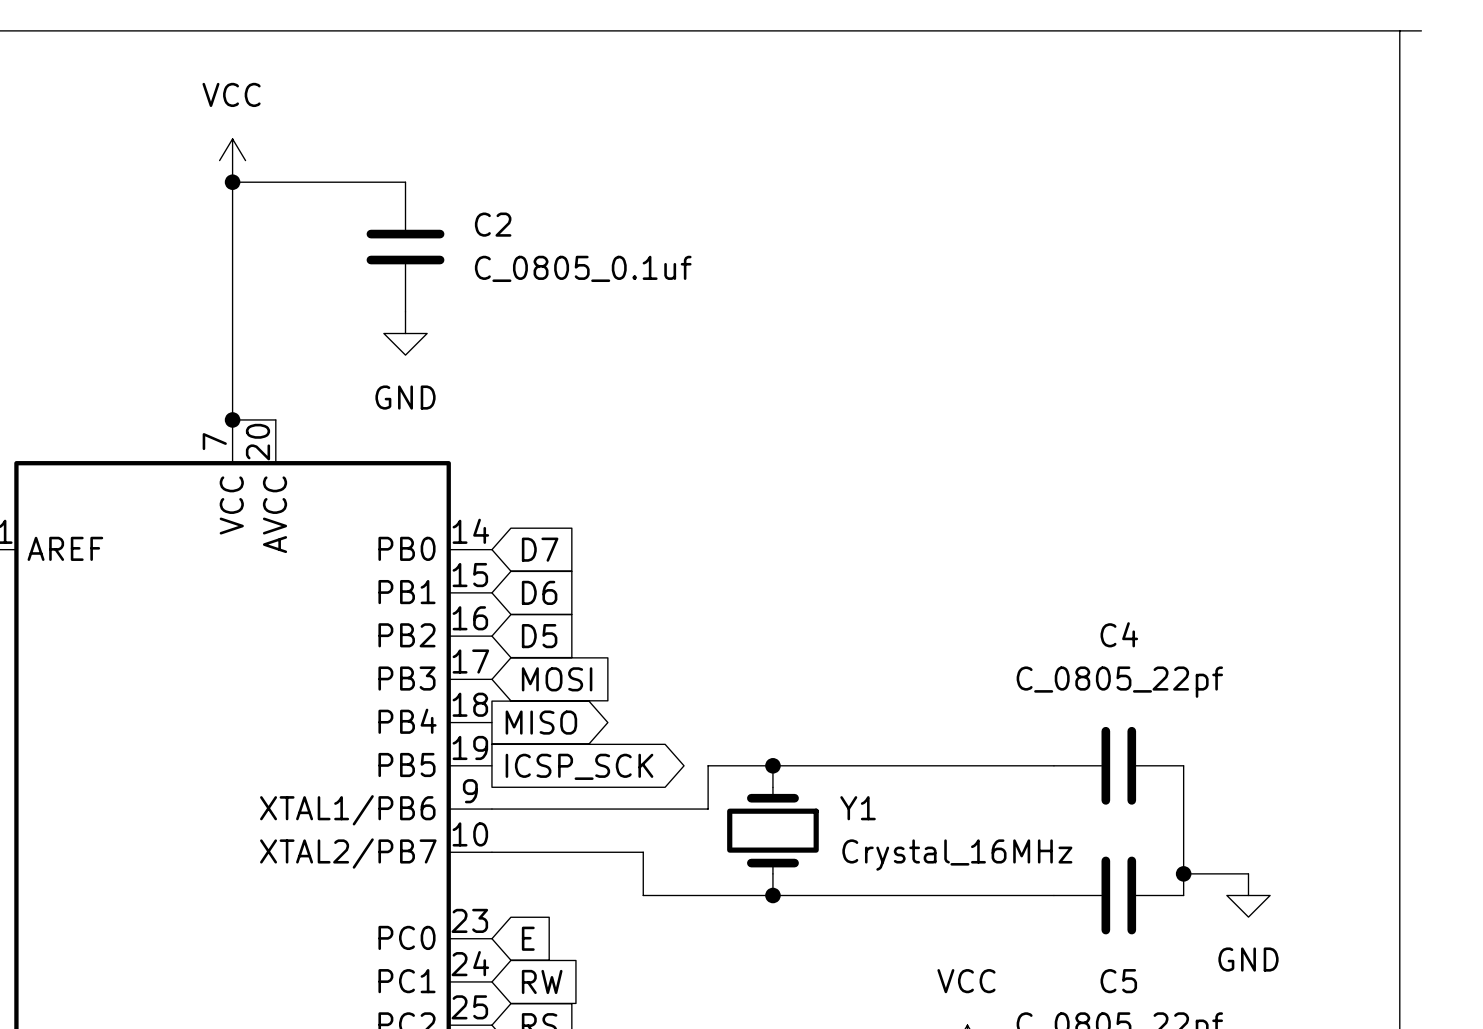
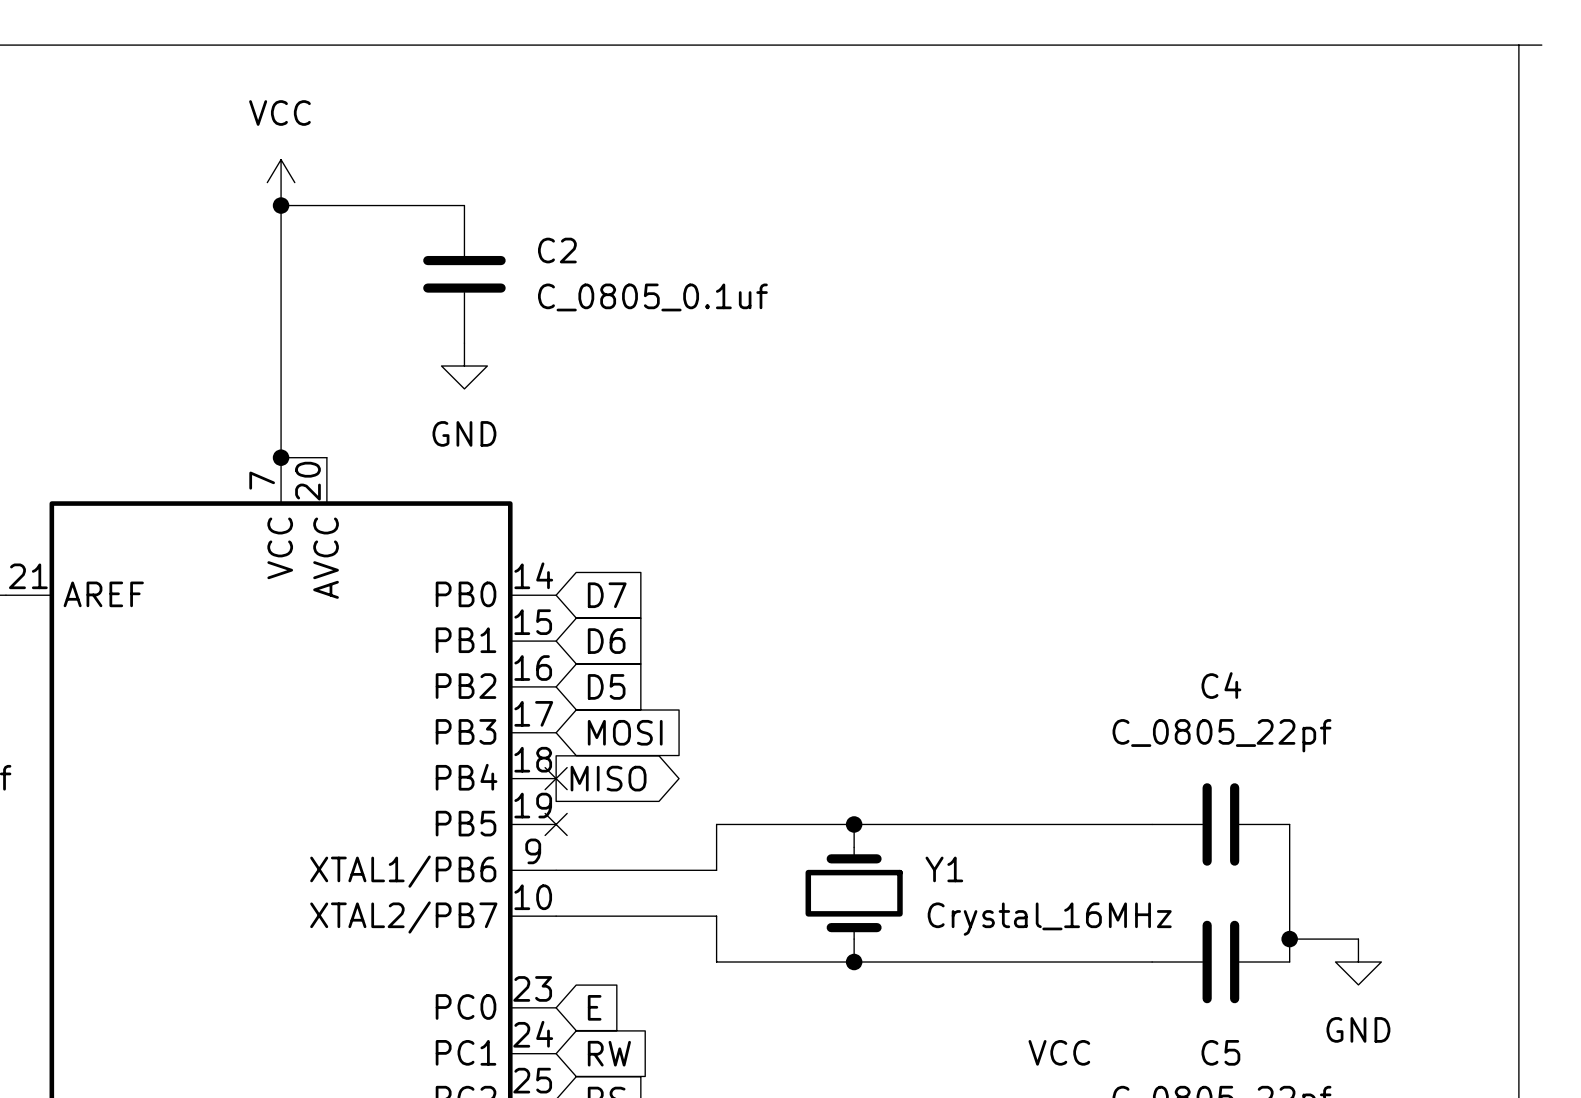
no-connect mark: none -> (556, 778)
no-connect mark: none -> (556, 824)
wire: (708, 765) (708, 809) (643, 809) -> (785, 824) (716, 824) (716, 870)
global label: ICSP_SCK (579, 766) -> none

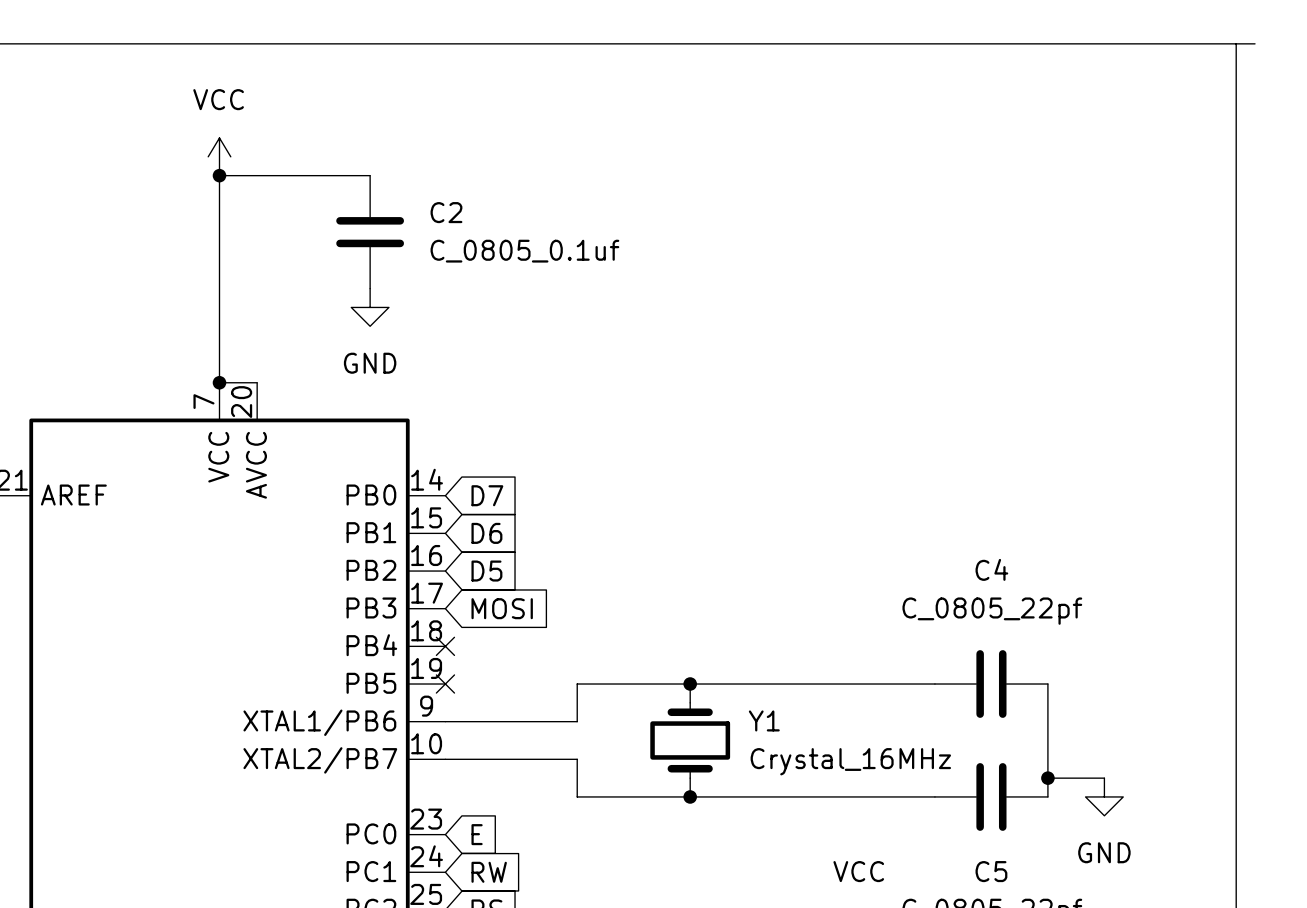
global label: MISO (608, 778) -> none

